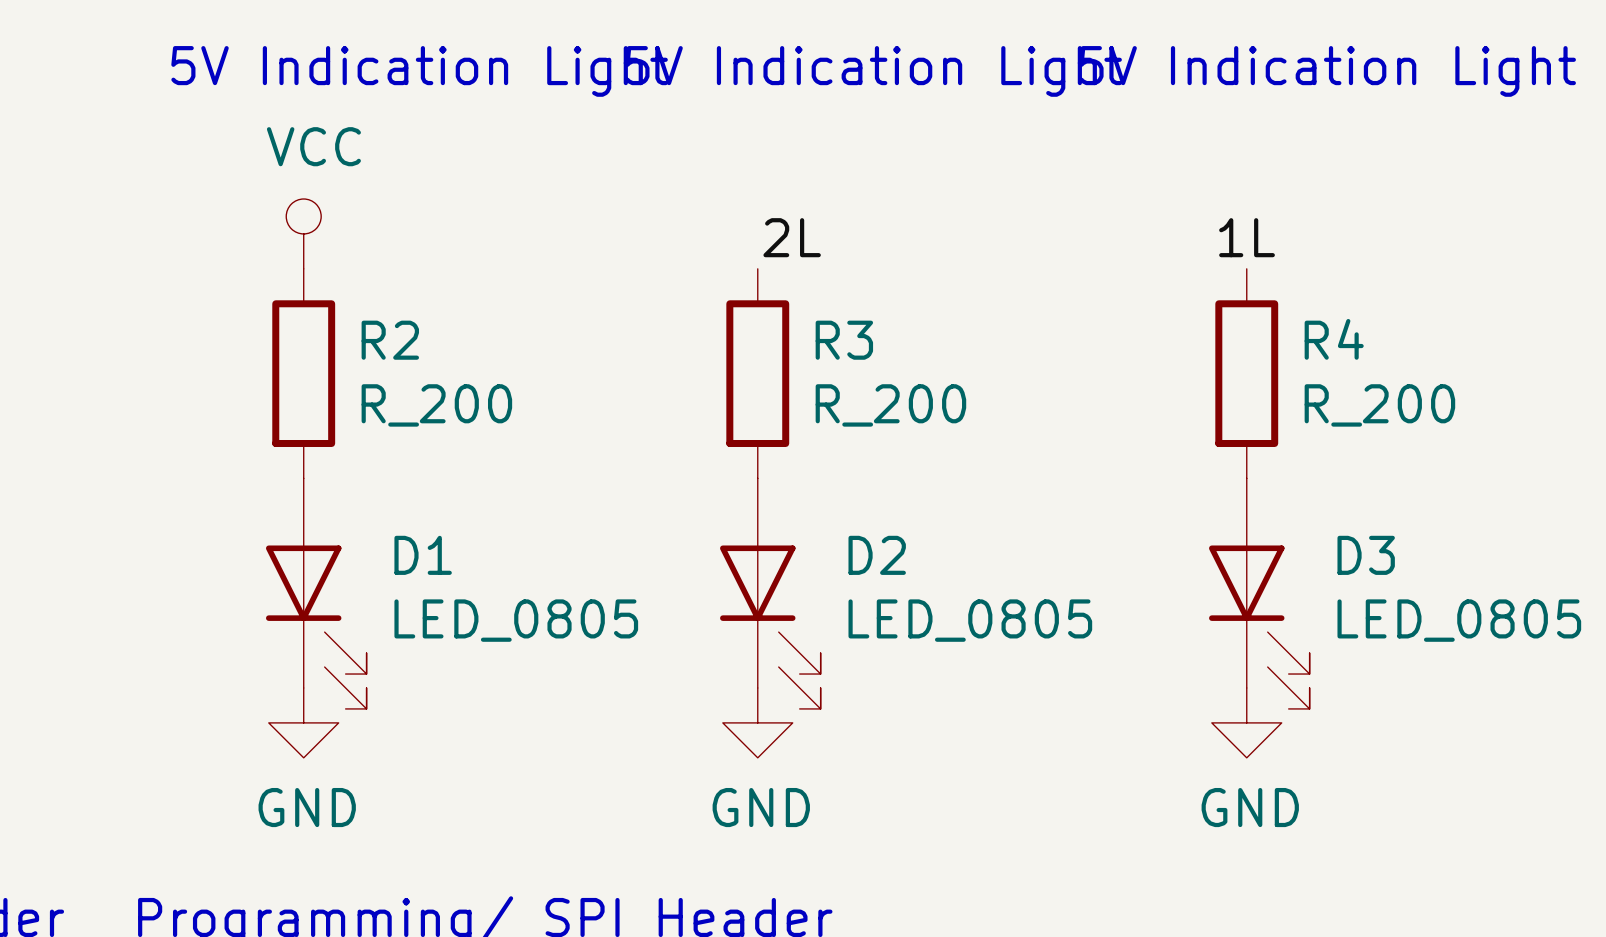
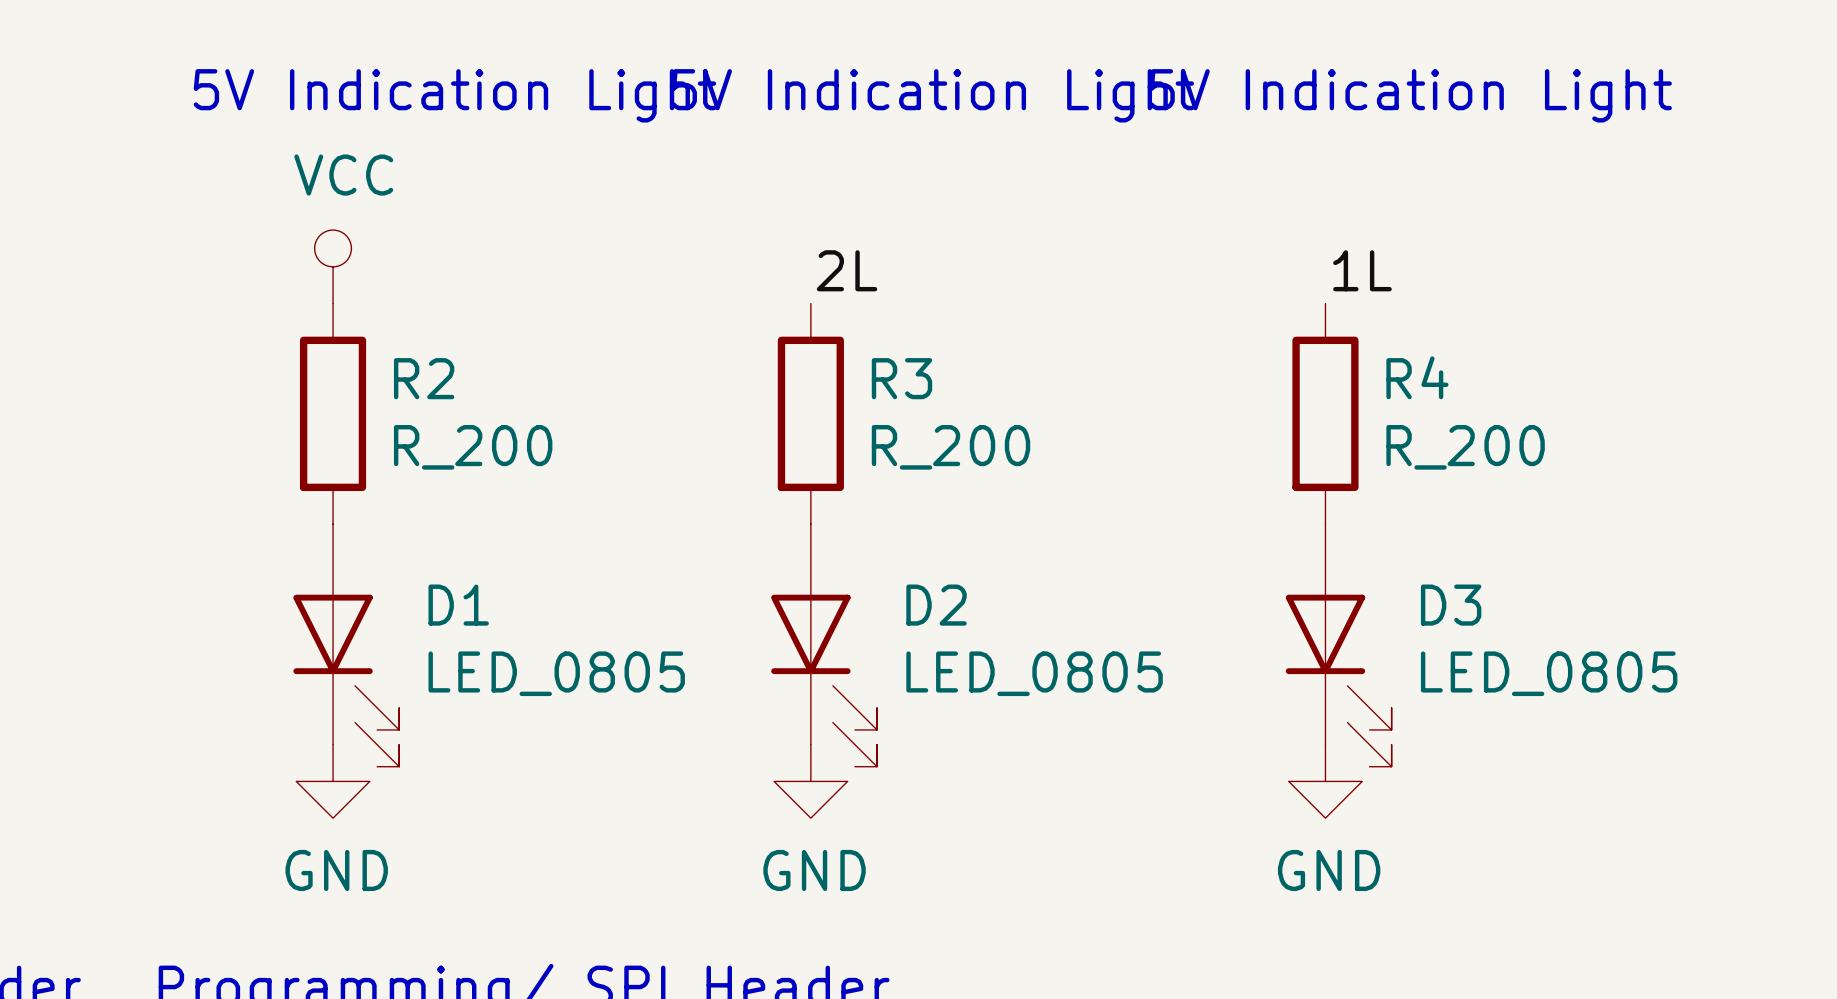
label position: 1L (1247, 237) -> 1L (1362, 270)

